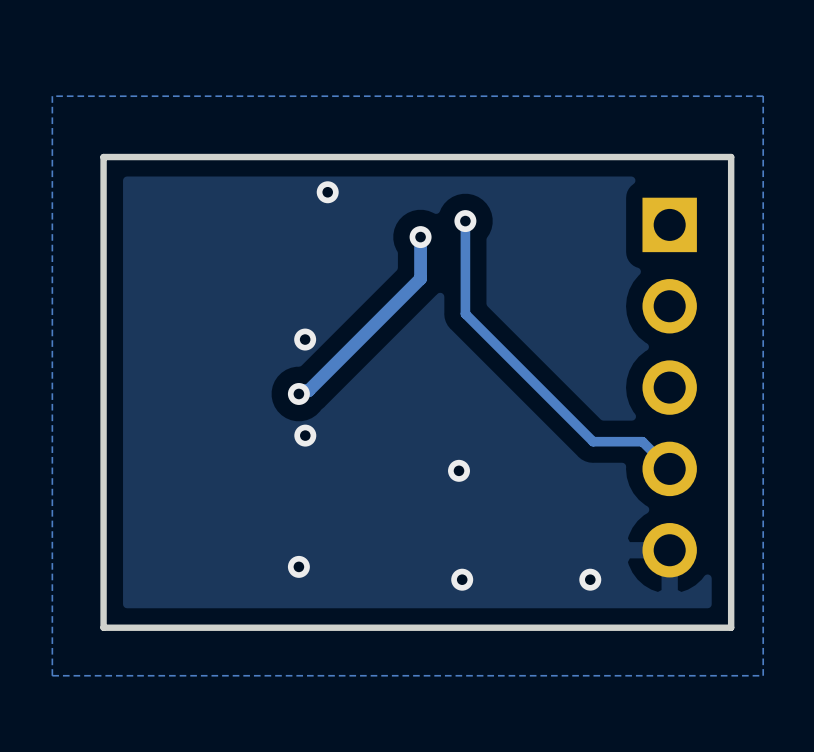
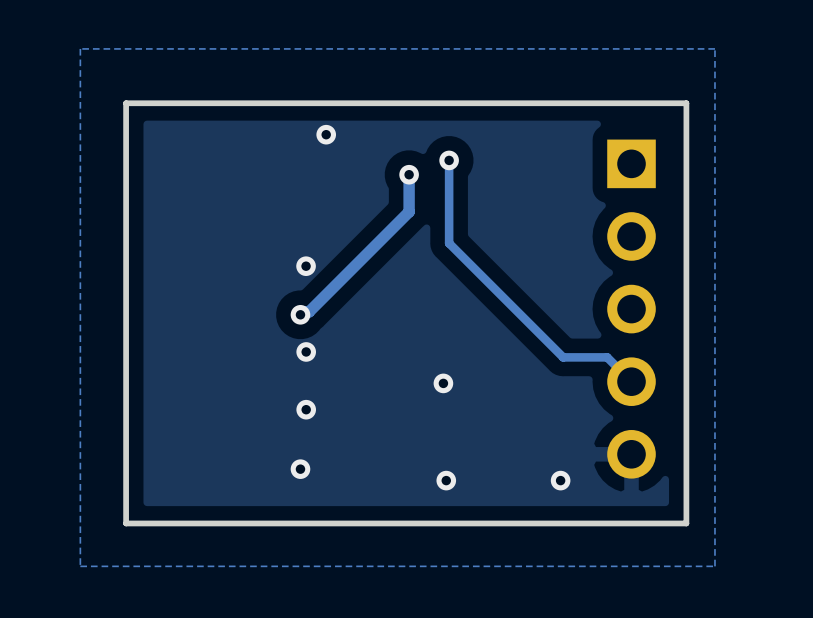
via: none -> (306, 409)

